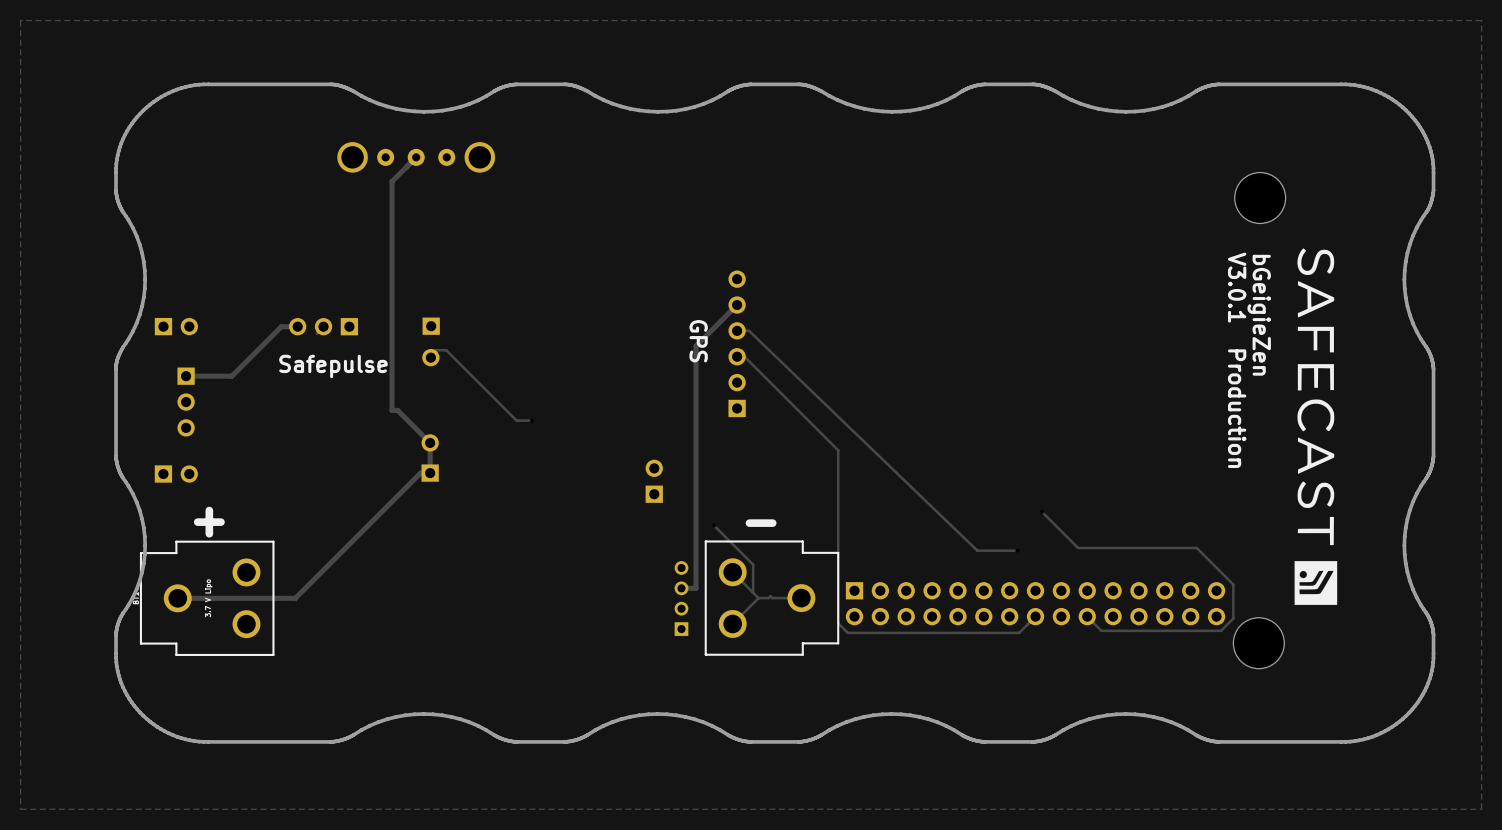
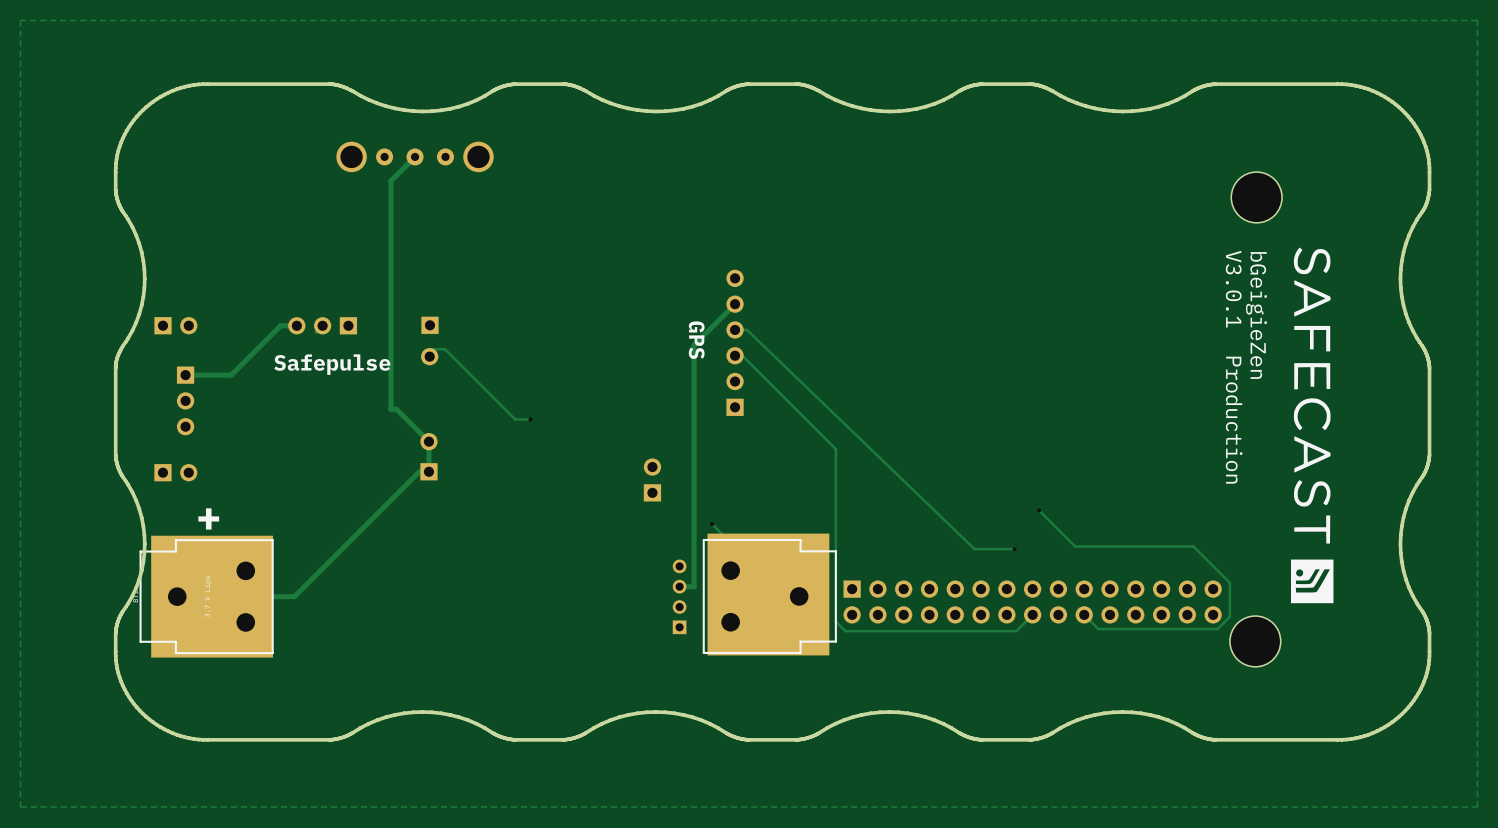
part footprint: [139, 540, 840, 656] -> [139, 533, 837, 658]

